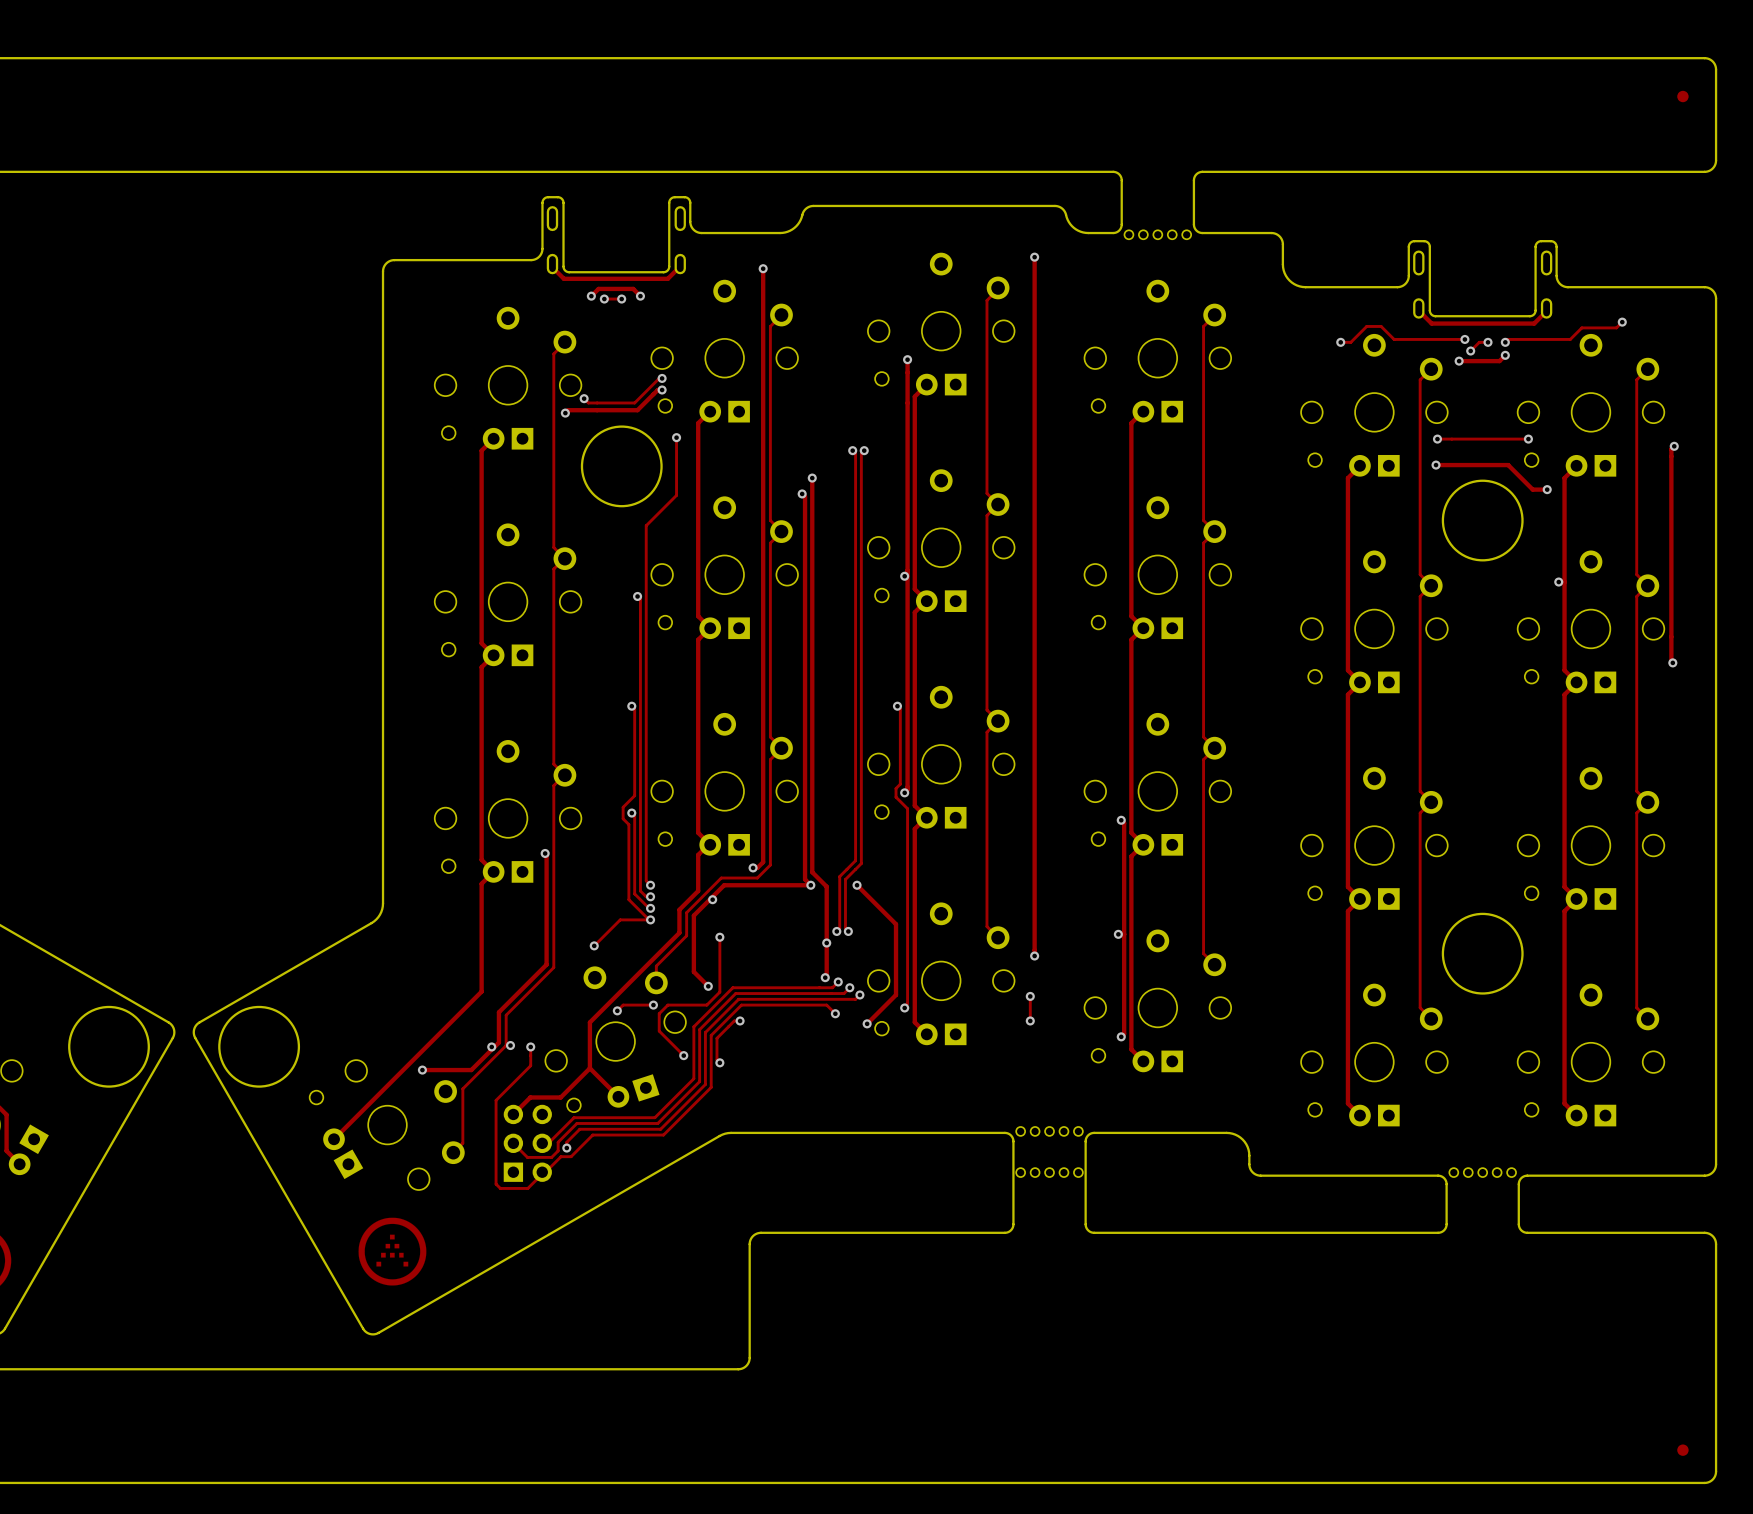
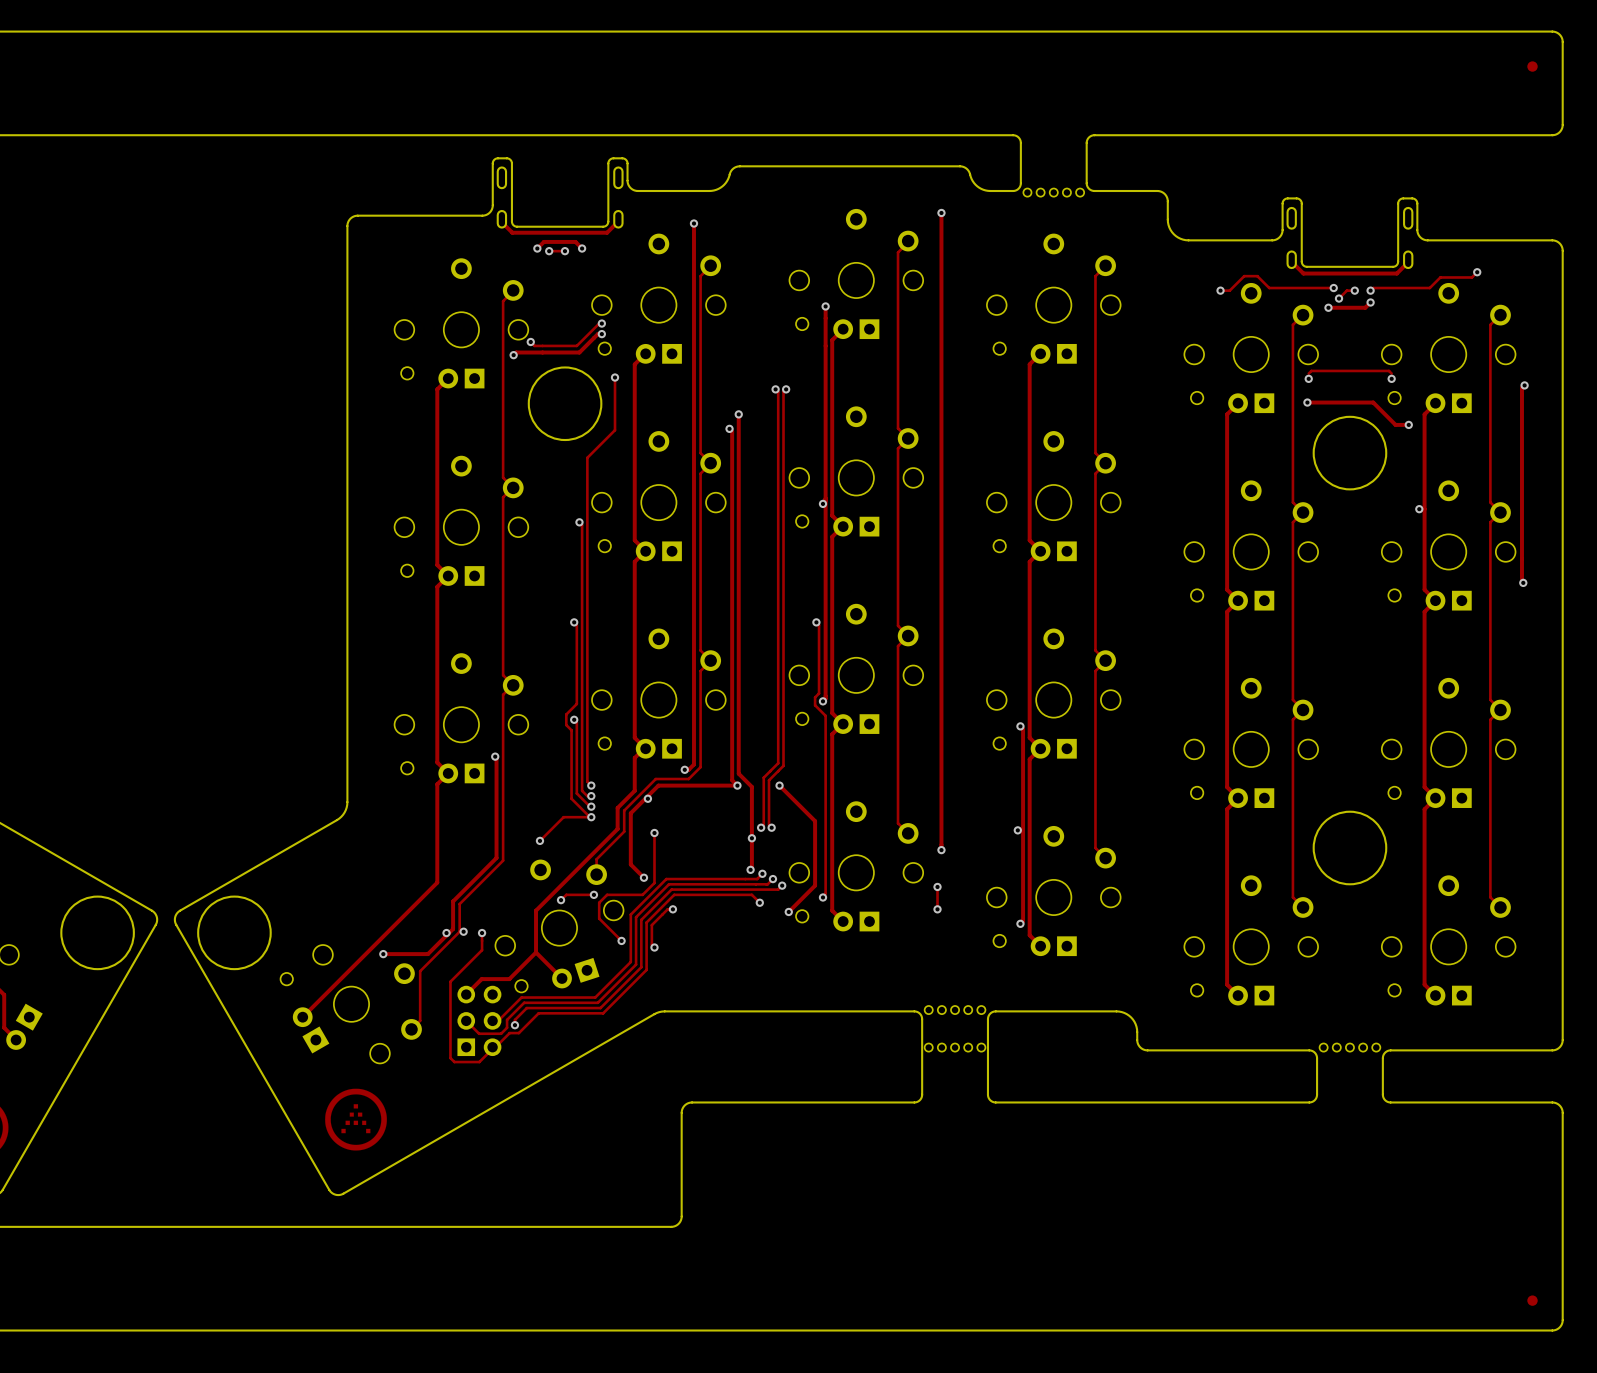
track: none -> (1308, 373) (1311, 370) (1389, 370) (1391, 373)
track: (1437, 439) (1528, 439) -> none

